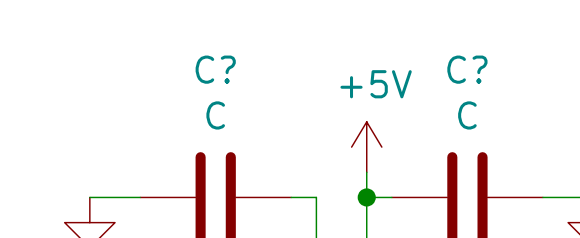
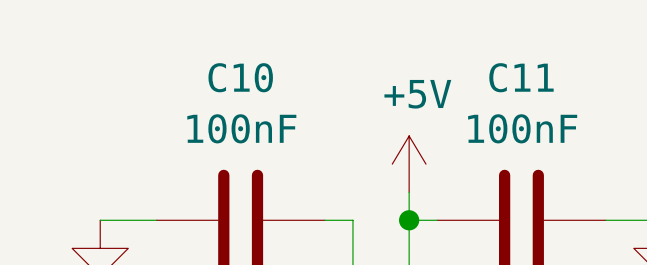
C? name: C? (215, 69) -> C10 (240, 77)
C? name: C? (467, 69) -> C11 (521, 77)
C? value: C (215, 115) -> 100nF (241, 128)
C? value: C (467, 115) -> 100nF (522, 128)

